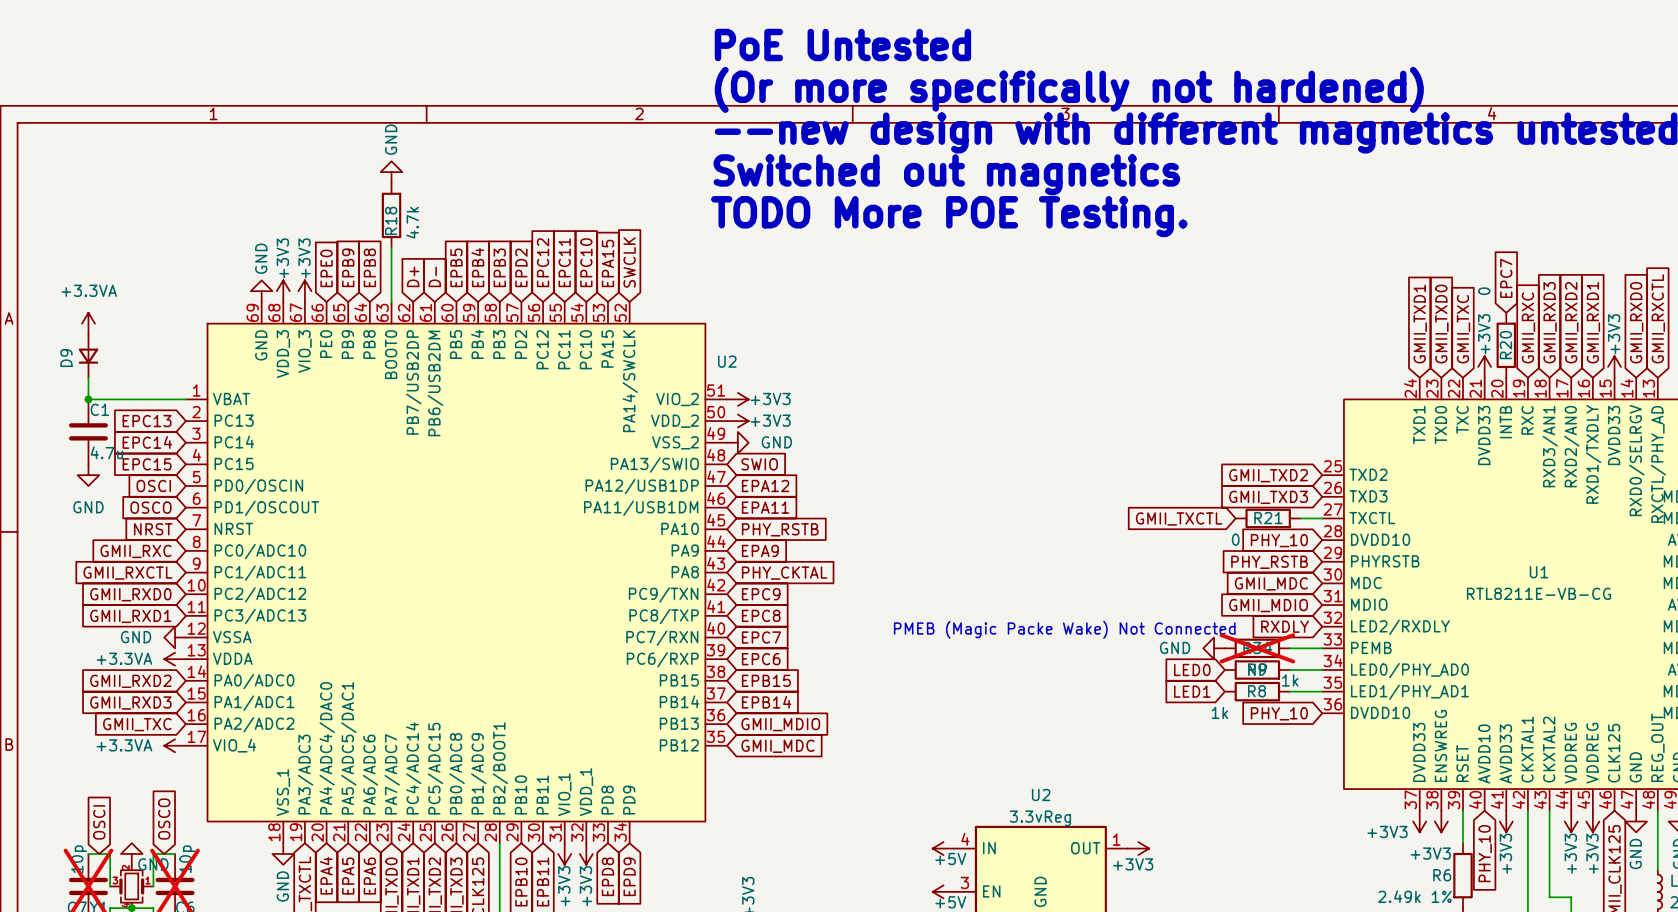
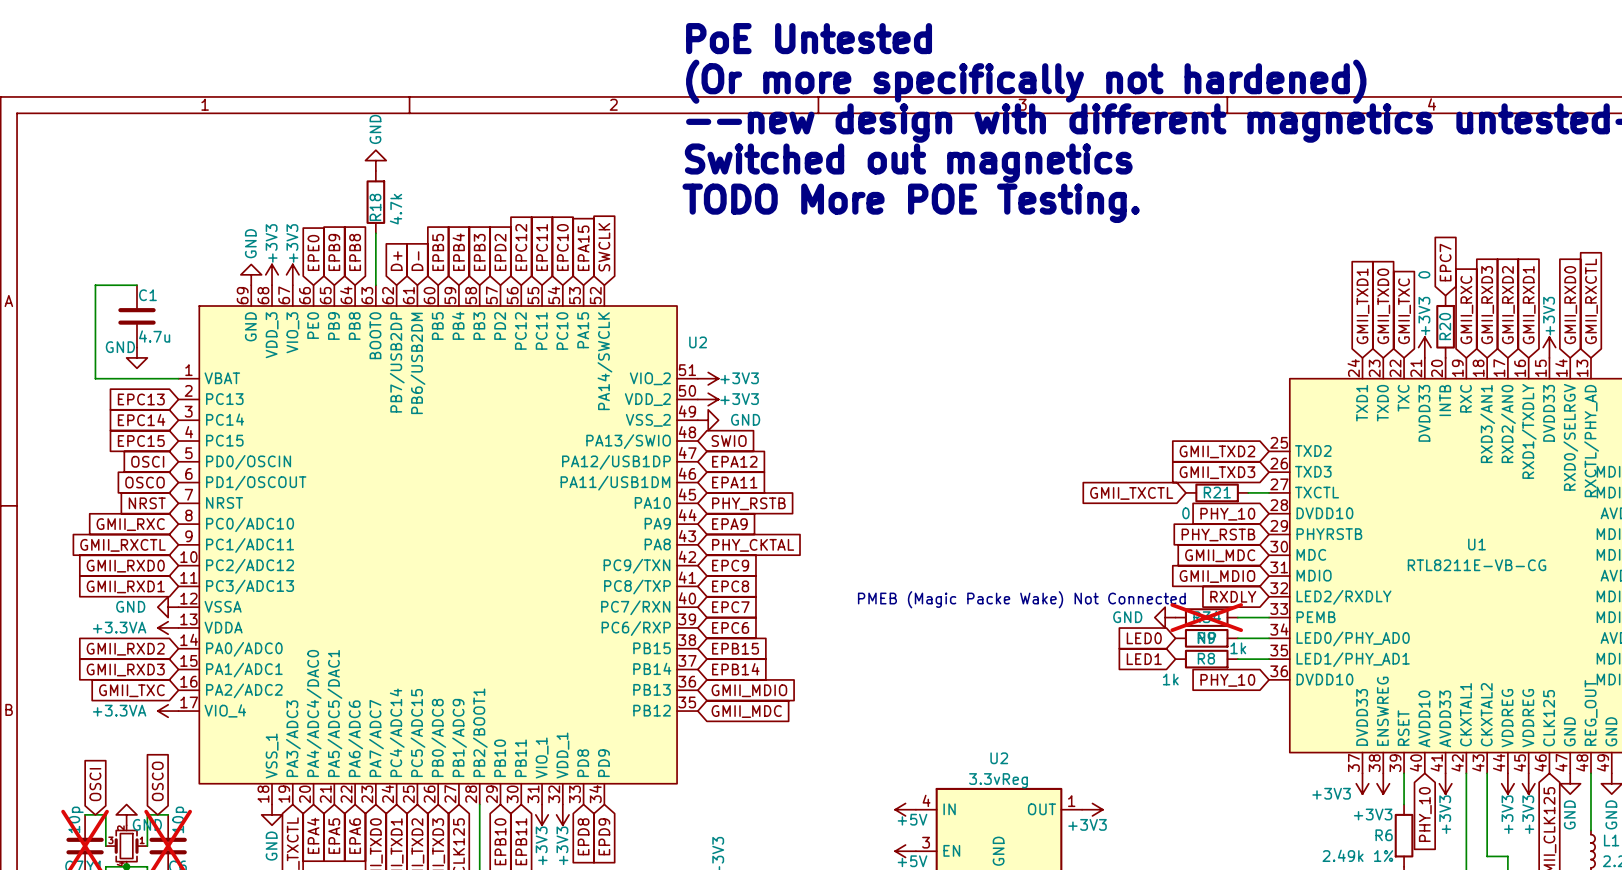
power symbol: +3.3VA (88, 323) -> none
D9: (88, 356) -> none
wire: (88, 377) (88, 399) (99, 399) -> (136, 285) (95, 285) (95, 378)
junction: (88, 399) -> none
C1 position: (88, 431) -> (136, 316)
power symbol position: GND (88, 475) -> GND (136, 357)
power symbol text position: GND (88, 507) -> GND (120, 347)

